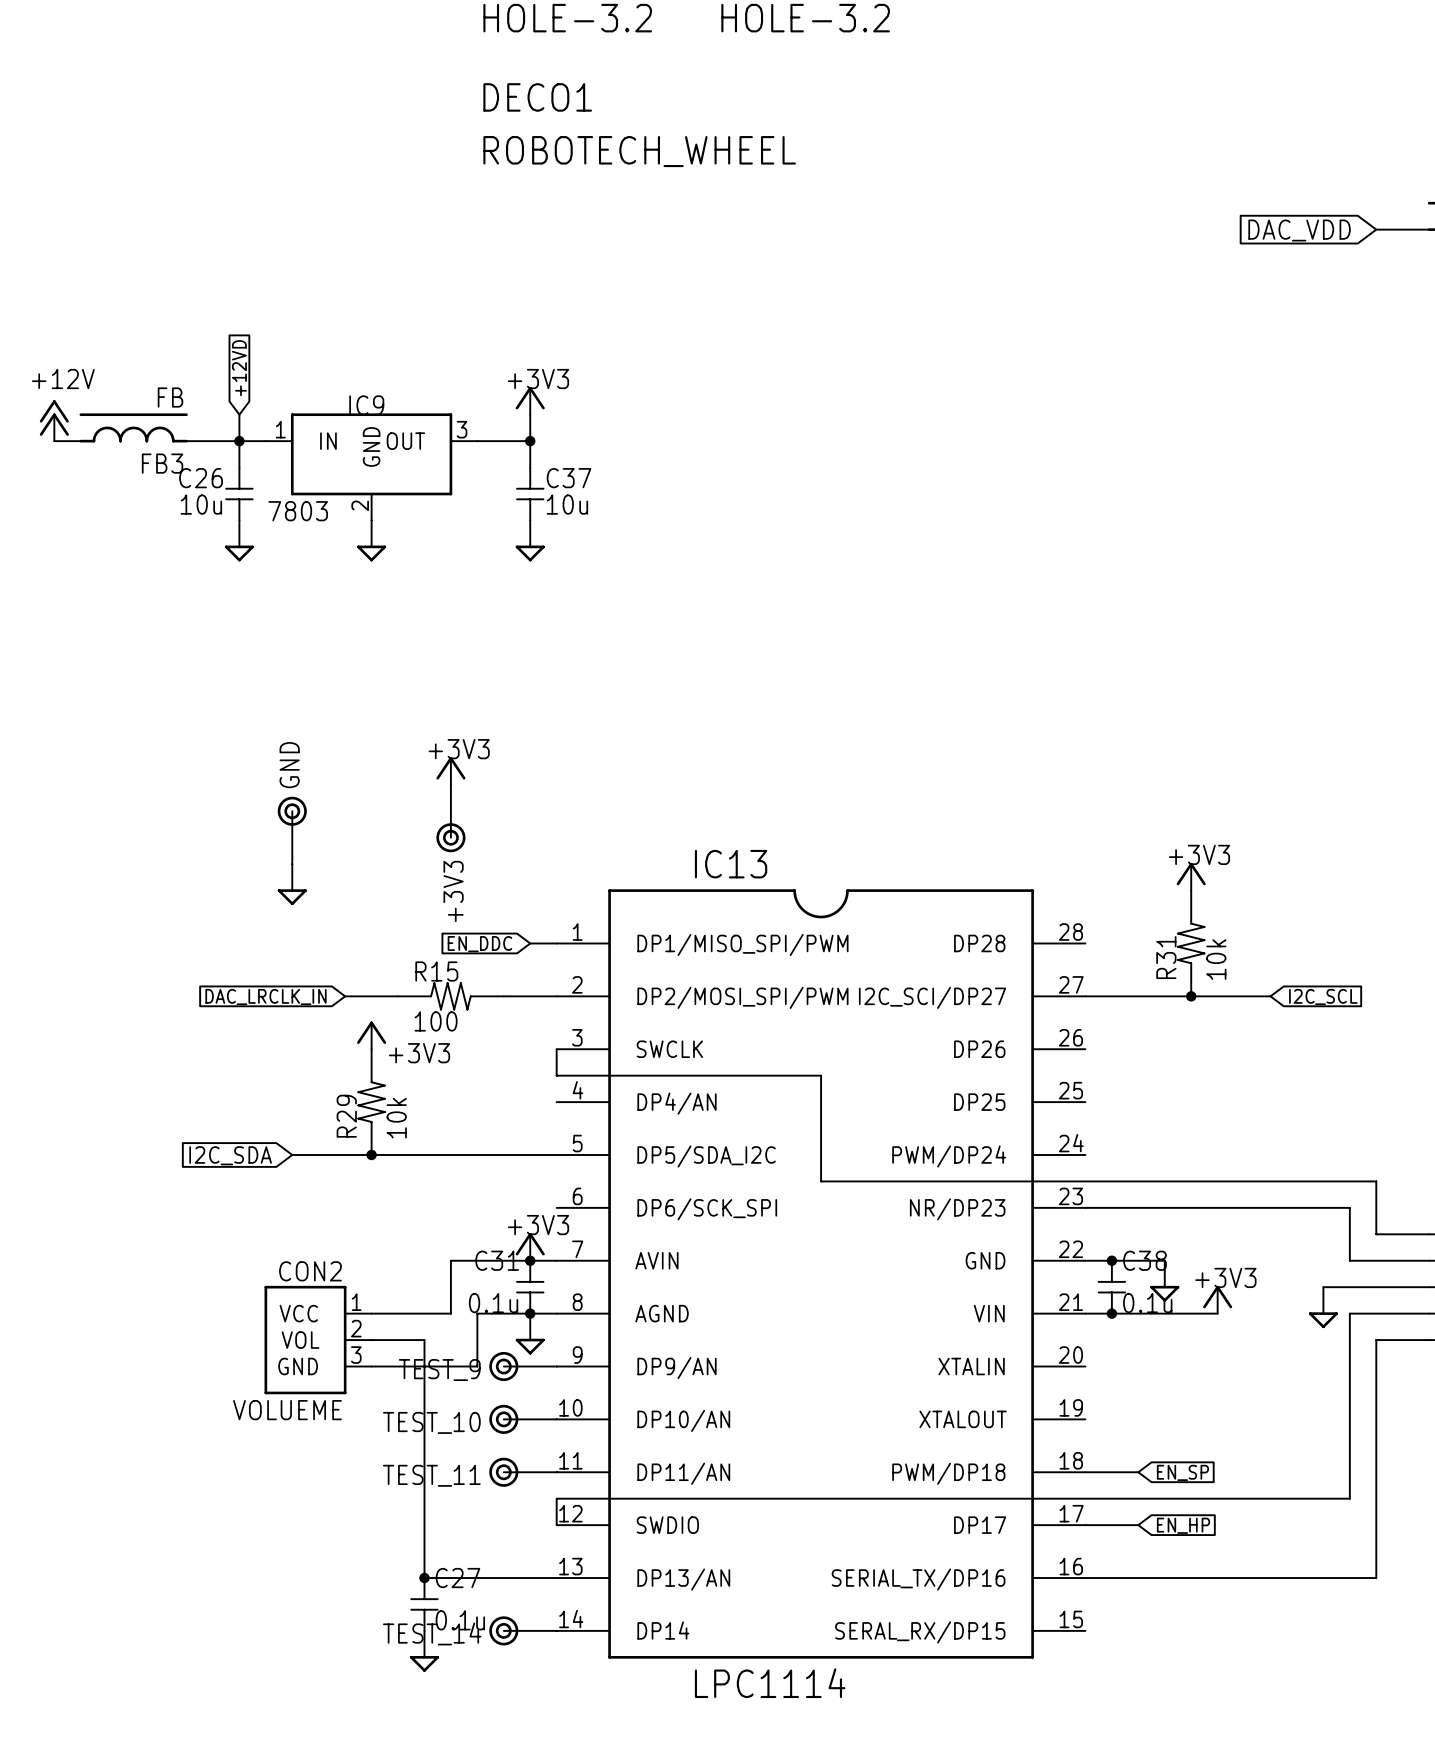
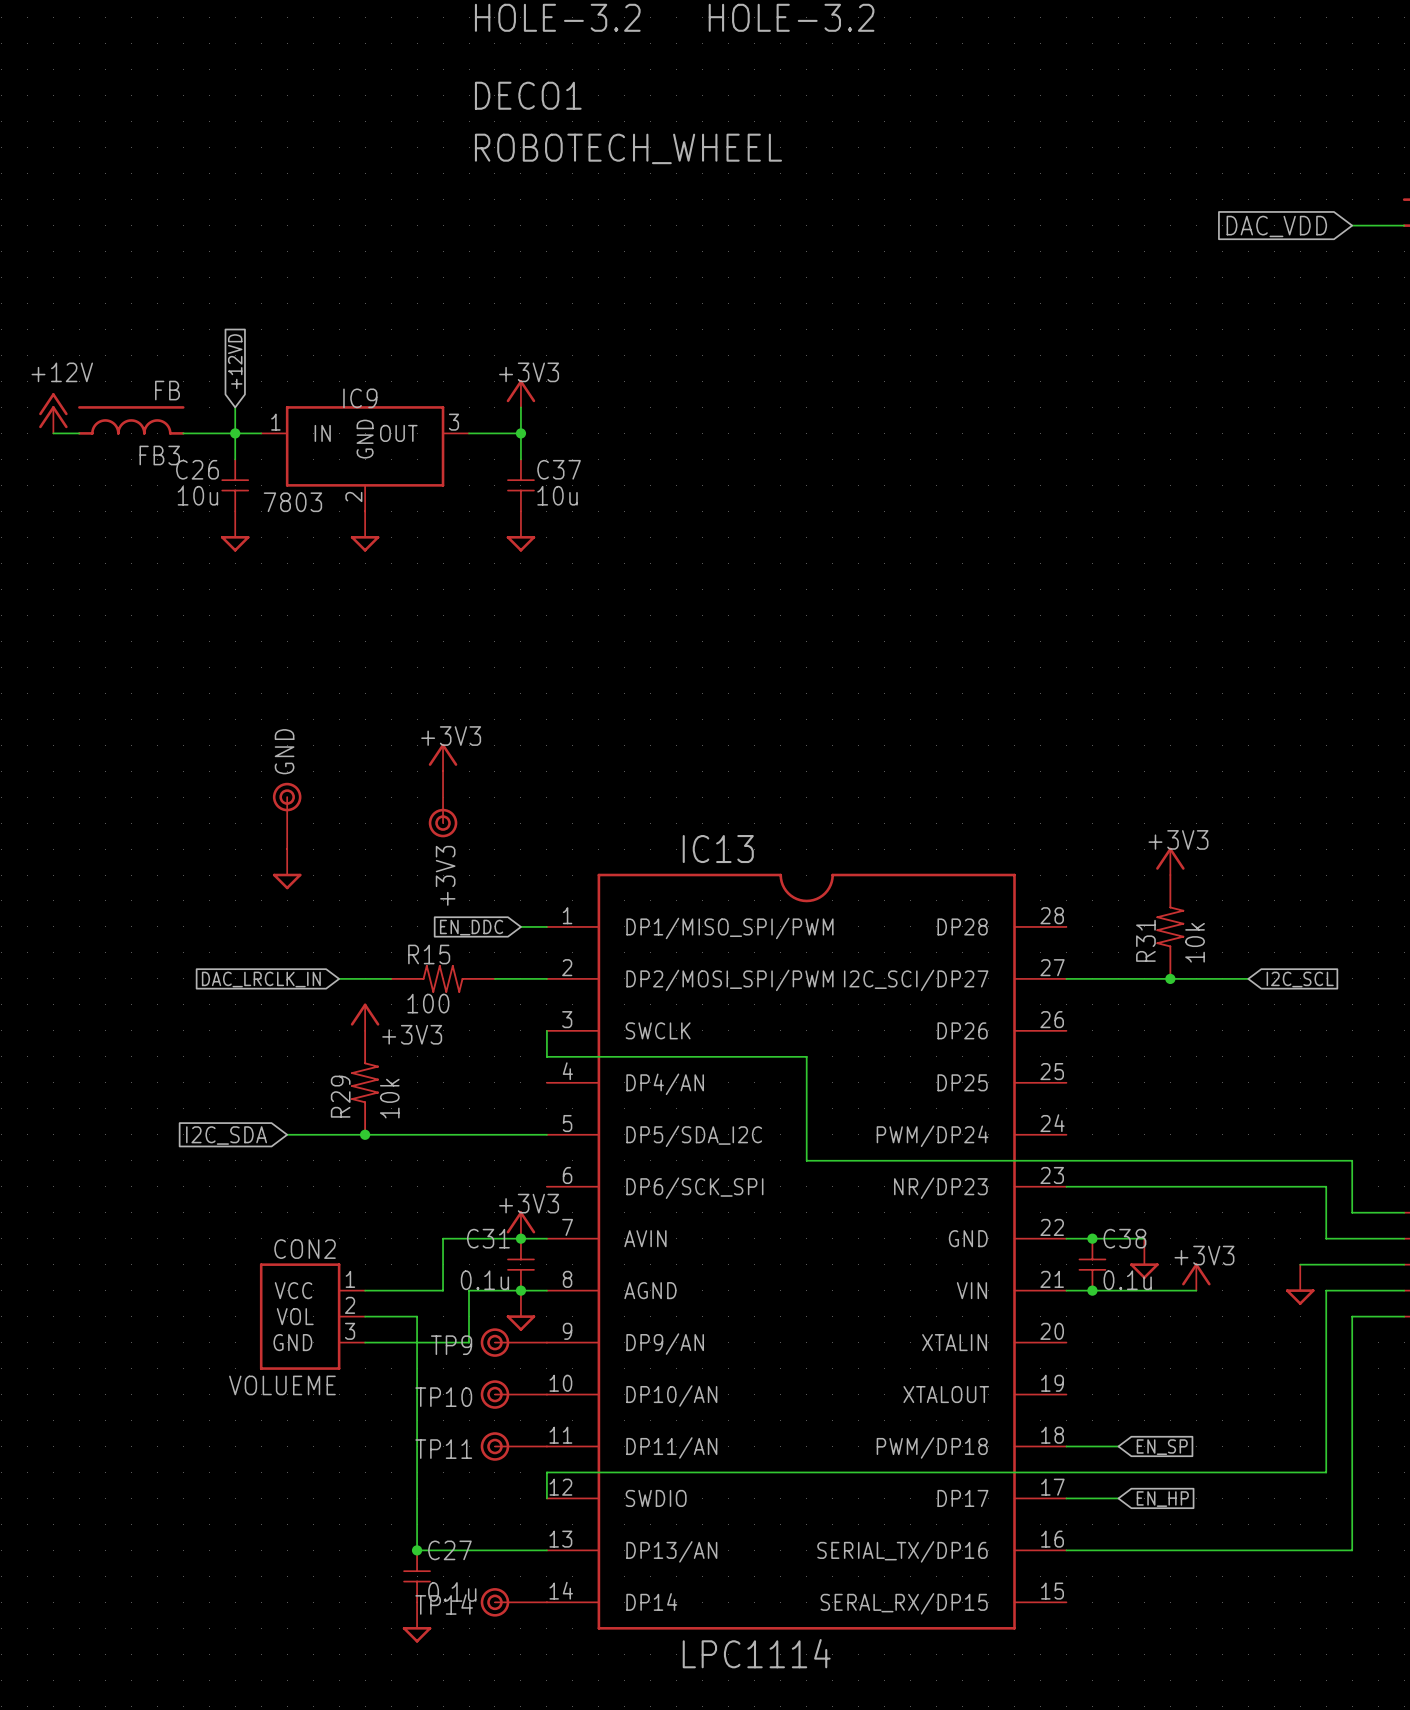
part value: TEST_9 (439, 1370) -> TP9 (451, 1345)
part value: TEST_10 (431, 1422) -> TP10 (443, 1397)
part value: TEST_11 (431, 1475) -> TP11 (443, 1449)
part value: TEST_14 (432, 1633) -> TP14 (444, 1604)

